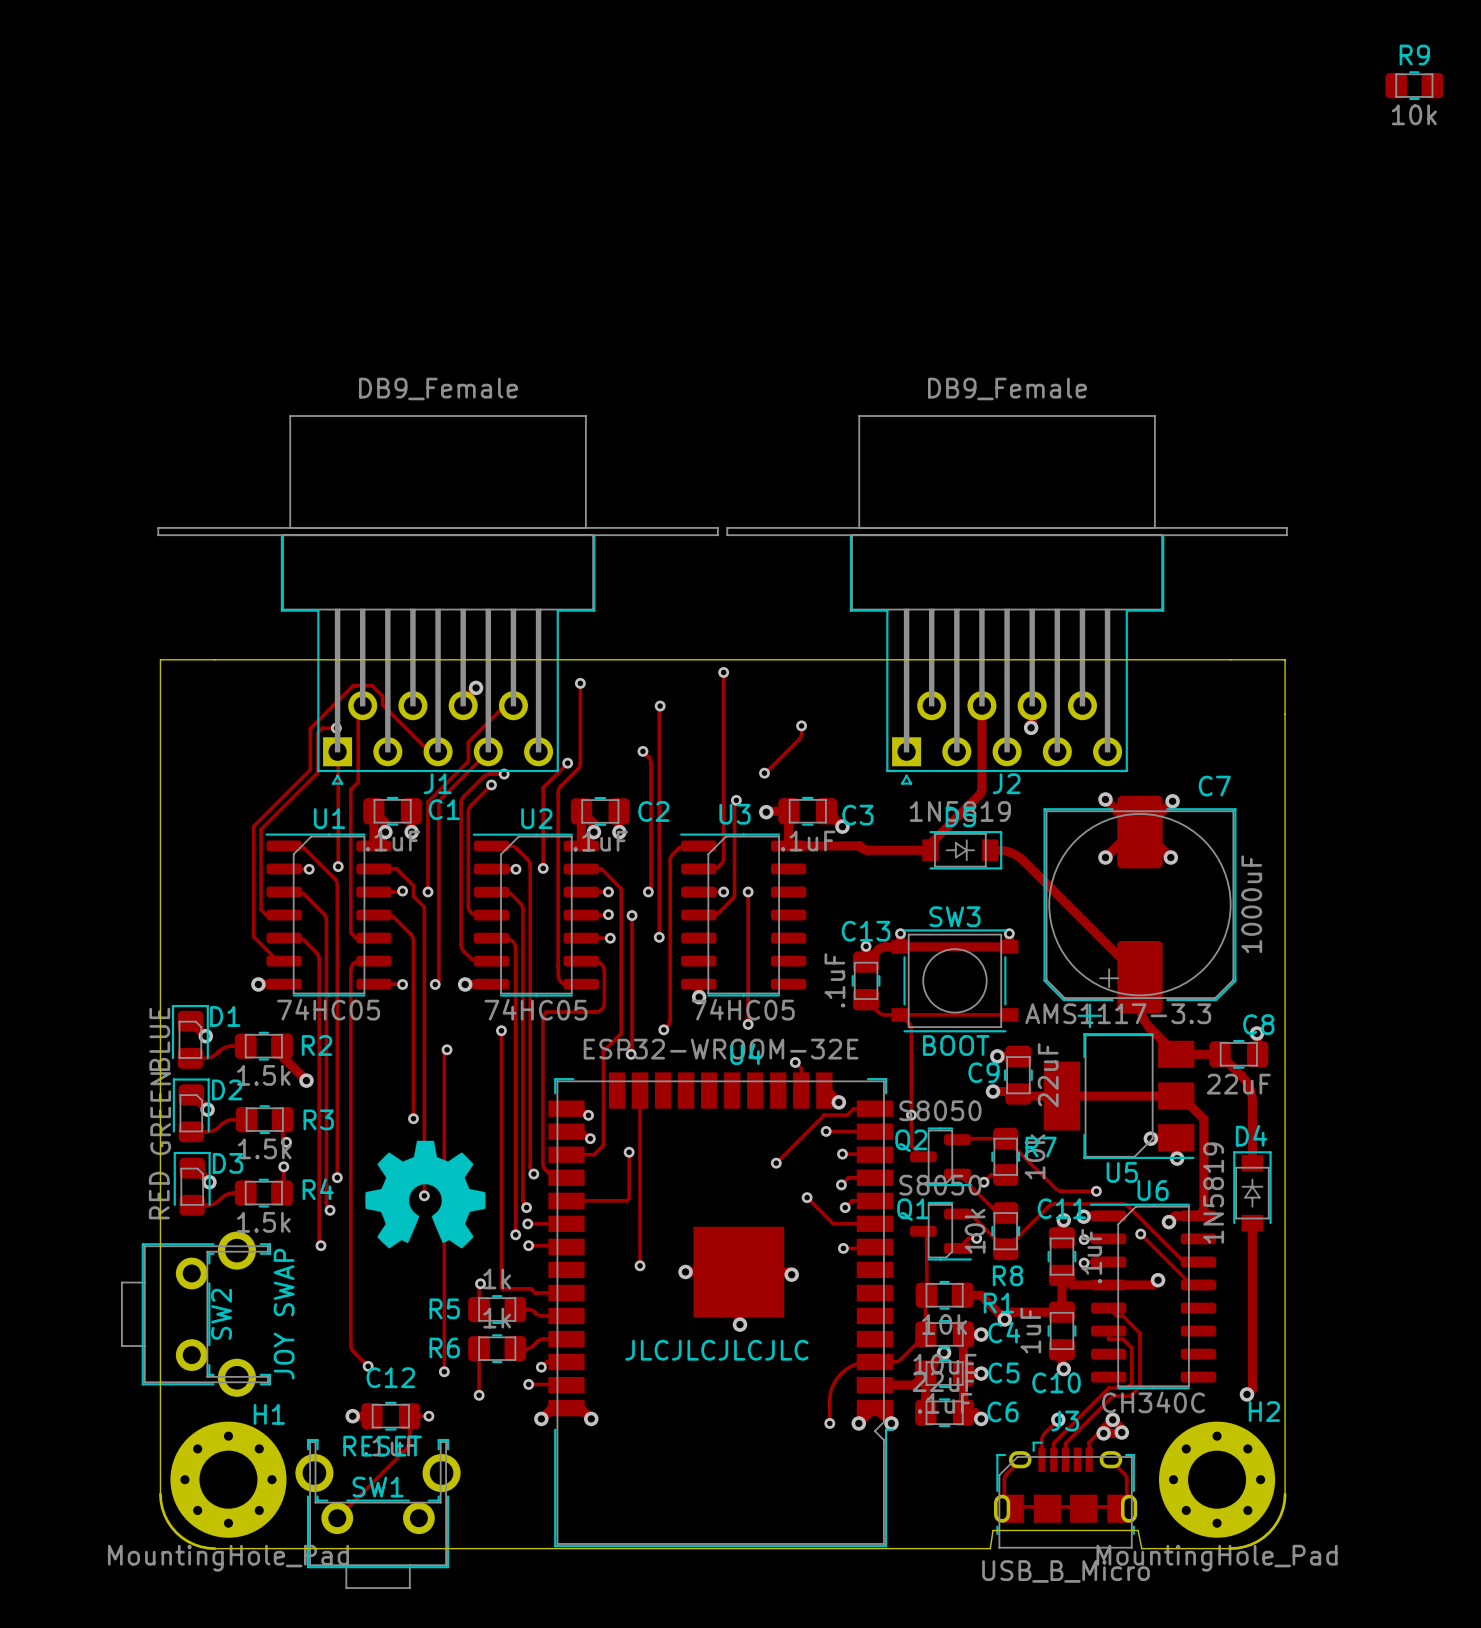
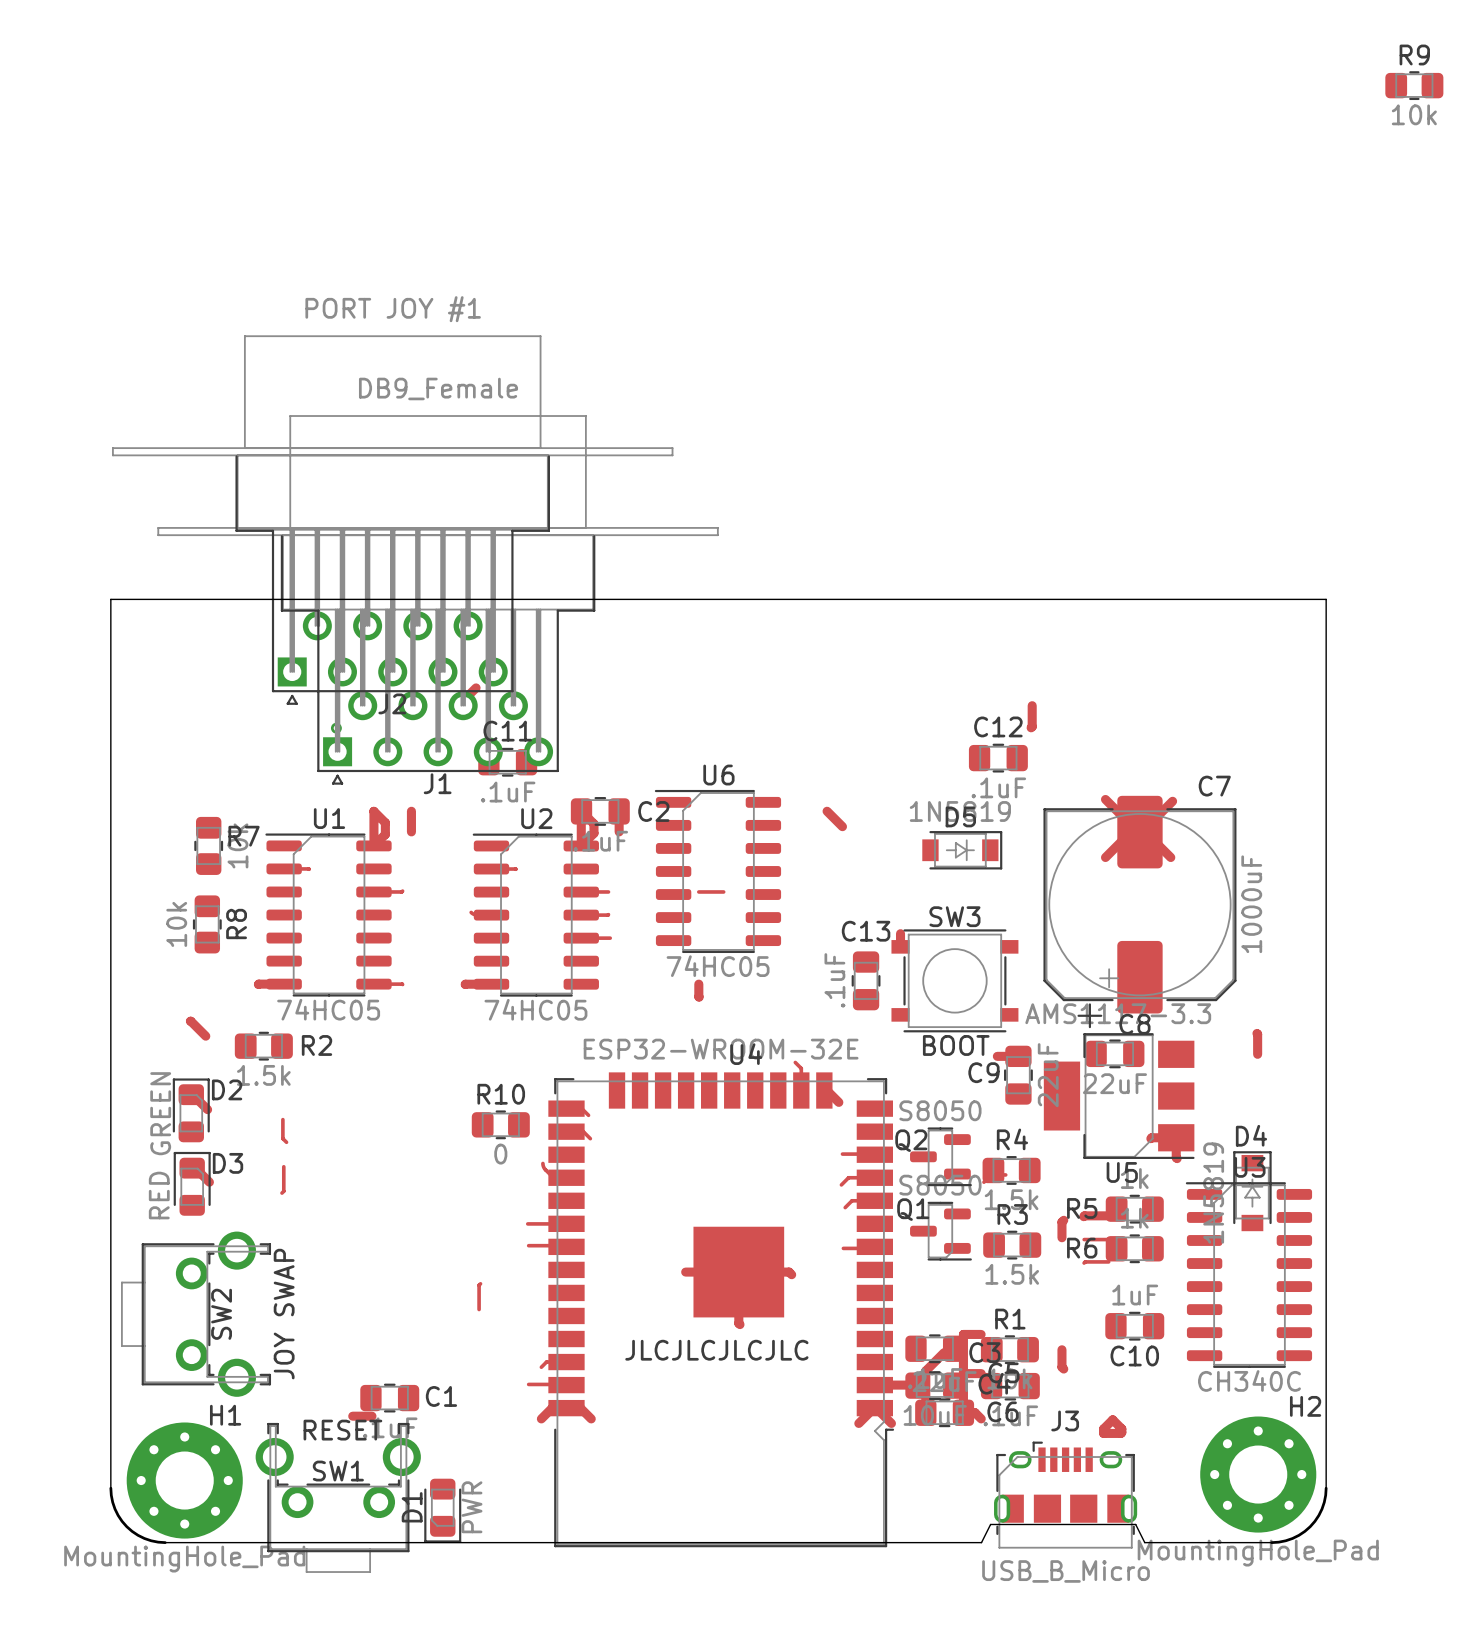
J2 value: DB9_Female (1007, 388) -> PORT JOY #1 (393, 309)
J2 position: (1007, 599) -> (392, 520)
board edge: (160, 659) (160, 1494) (162, 1508) (167, 1521) (181, 1537) (200, 1546) (214, 1548) (990, 1548) (993, 1530) (1138, 1530) (1141, 1548) (1230, 1548) (1244, 1546) (1257, 1541) (1273, 1527) (1280, 1515) (1285, 1494) (1285, 659) (160, 659) -> (110, 599) (110, 1488) (112, 1502) (118, 1515) (132, 1531) (151, 1540) (165, 1542) (981, 1542) (990, 1524) (1135, 1524) (1144, 1542) (1271, 1542) (1285, 1540) (1298, 1535) (1314, 1521) (1324, 1502) (1326, 1488) (1326, 599) (110, 599)
track: (723, 672) (723, 859) (716, 868) (698, 868) -> none
via: (723, 672) -> none
track: (580, 683) (580, 764) (558, 791) (558, 967) -> none
via: (580, 683) -> none
via: (476, 687) -> none
track: (362, 705) (358, 710) (358, 782) (350, 789) (350, 932) (356, 938) (373, 938) -> none
track: (513, 705) (504, 705) (468, 742) (468, 761) (428, 801) (428, 891) -> none
track: (981, 705) (981, 792) (932, 841) (930, 850) (867, 850) (859, 845) (788, 845) (788, 811) (766, 812) -> none
track: (660, 706) (659, 937) -> none
via: (660, 706) -> none
via: (801, 725) -> none
track: (801, 726) (799, 738) (764, 773) -> none
via: (1031, 727) -> none
track: (336, 728) (322, 728) (317, 732) (317, 772) (261, 829) (261, 909) (266, 915) (284, 915) -> none
track: (337, 751) (338, 866) -> none
track: (438, 751) (429, 751) (382, 704) (382, 696) (372, 685) (353, 685) (310, 728) (310, 769) (253, 826) (253, 936) (277, 960) (284, 961) -> none
track: (488, 751) (438, 801) (438, 980) (435, 984) -> none
track: (642, 751) (649, 757) (651, 763) (651, 885) (648, 891) -> none
via: (642, 751) -> none
track: (567, 763) (543, 787) (543, 868) -> none
via: (567, 763) -> none
via: (764, 773) -> none
track: (504, 774) (485, 775) (463, 796) (461, 802) (461, 945) (473, 960) (491, 961) -> none
via: (504, 774) -> none
track: (491, 784) (468, 810) (468, 905) (471, 912) -> none
via: (491, 784) -> none
via: (1105, 799) -> none
track: (736, 800) (734, 802) (734, 895) (717, 913) (698, 915) -> none
via: (736, 800) -> none
via: (1172, 801) -> none
C1 position: (392, 811) -> (389, 1398)
C3 position: (807, 811) -> (934, 1348)
via: (766, 812) -> none
via: (842, 826) -> none
via: (385, 832) -> none
via: (411, 832) -> none
via: (593, 832) -> none
via: (619, 832) -> none
U3 footprint: [680, 833, 807, 997] -> [1185, 1182, 1313, 1368]
track: (284, 845) (303, 847) (334, 878) (337, 883) (337, 1177) -> none
track: (491, 845) (514, 847) (527, 859) (530, 864) (530, 1166) (533, 1174) -> none
track: (698, 845) (680, 846) (670, 859) (670, 1019) (663, 1029) -> none
track: (990, 850) (1008, 851) (1020, 858) (1139, 977) (1140, 1006) (1142, 1016) (1148, 1026) (1176, 1054) (1220, 1054) (1244, 1078) (1249, 1087) (1252, 1098) (1252, 1163) -> none
via: (1105, 857) -> none
via: (1170, 857) -> none
via: (338, 866) -> none
track: (373, 868) (396, 868) (413, 885) (413, 896) (424, 907) (424, 1195) -> none
via: (543, 868) -> none
via: (309, 869) -> none
via: (515, 869) -> none
track: (581, 869) (601, 869) (621, 888) (621, 1033) (603, 1051) (603, 1145) (593, 1154) (566, 1154) -> none
track: (284, 891) (303, 893) (323, 913) (326, 919) (326, 1202) (330, 1210) -> none
via: (402, 891) -> none
via: (428, 891) -> none
via: (608, 891) -> none
via: (648, 891) -> none
via: (723, 891) -> none
track: (748, 891) (748, 1024) -> none
via: (748, 891) -> none
track: (491, 892) (509, 893) (522, 908) (522, 1200) (526, 1207) -> none
via: (608, 914) -> none
track: (373, 915) (392, 916) (410, 934) (413, 939) (413, 1118) -> none
track: (632, 915) (631, 1054) -> none
via: (632, 915) -> none
via: (900, 933) -> none
track: (1009, 933) (1009, 946) (884, 946) (879, 948) (866, 962) (866, 946) -> none
via: (1009, 933) -> none
via: (659, 937) -> none
track: (284, 938) (302, 939) (316, 952) (319, 957) (319, 1243) (320, 1245) -> none
track: (491, 938) (508, 938) (515, 947) (515, 1234) -> none
via: (610, 938) -> none
via: (866, 946) -> none
track: (373, 961) (356, 961) (352, 964) (350, 970) (350, 1345) (352, 1350) (368, 1366) -> none
track: (581, 961) (596, 961) (603, 966) (604, 1004) (601, 1009) (596, 1011) (546, 1012) (543, 1015) (542, 1161) -> none
track: (558, 967) (558, 978) (563, 984) (581, 984) -> none
via: (258, 984) -> none
via: (402, 984) -> none
via: (435, 984) -> none
via: (465, 984) -> none
via: (699, 997) -> none
track: (866, 999) (879, 1012) (884, 1014) (1009, 1014) -> none
U3 value: 74HC05 (743, 1009) -> CH340C (1249, 1380)
track: (900, 1014) (911, 1028) (911, 1145) (922, 1156) -> none
via: (748, 1024) -> none
via: (663, 1029) -> none
track: (501, 1030) (501, 1287) (531, 1288) (535, 1292) (566, 1292) -> none
via: (501, 1030) -> none
via: (1256, 1033) -> none
D1 rotation: 0° (190, 1036) -> 180° (442, 1510)
D1 position: (190, 1036) -> (442, 1510)
via: (205, 1036) -> none
D1 value: BLUE (159, 1039) -> PWR (472, 1507)
track: (245, 1046) (226, 1046) (208, 1058) (190, 1058) -> none
track: (281, 1046) (281, 1056) (306, 1080) -> none
track: (447, 1049) (444, 1052) (444, 1371) -> none
via: (447, 1049) -> none
via: (631, 1054) -> none
C8 position: (1238, 1054) -> (1114, 1053)
via: (997, 1056) -> none
via: (795, 1062) -> none
via: (306, 1080) -> none
track: (640, 1090) (640, 1265) -> none
track: (993, 1091) (1012, 1091) (1017, 1096) (1180, 1096) (1203, 1119) (1203, 1210) (1198, 1215) (1175, 1215) (1168, 1222) -> none
via: (993, 1091) -> none
via: (838, 1102) -> none
track: (874, 1108) (853, 1108) (847, 1115) (824, 1115) (776, 1163) -> none
via: (207, 1109) -> none
via: (588, 1115) -> none
via: (911, 1115) -> none
via: (413, 1118) -> none
track: (246, 1119) (228, 1120) (210, 1131) (191, 1131) -> none
R3 position: (264, 1119) -> (1012, 1245)
R3 name position: R3 (318, 1119) -> R3 (1012, 1214)
R10: none -> 0 (500, 1124)
track: (826, 1131) (874, 1131) -> none
via: (826, 1131) -> none
via: (590, 1138) -> none
via: (1150, 1138) -> none
track: (958, 1139) (1005, 1138) (1057, 1190) (1096, 1191) -> none
drawing: [365, 1140, 486, 1249] -> none
via: (286, 1142) -> none
track: (629, 1152) (629, 1198) (626, 1200) (566, 1200) -> none
via: (629, 1152) -> none
via: (842, 1154) -> none
R7 position: (1005, 1156) -> (208, 845)
via: (1177, 1158) -> none
via: (776, 1163) -> none
via: (283, 1166) -> none
via: (533, 1174) -> none
track: (958, 1174) (997, 1213) (1005, 1213) -> none
via: (337, 1177) -> none
via: (209, 1182) -> none
via: (983, 1182) -> none
via: (841, 1184) -> none
R4 name position: R4 (318, 1189) -> R4 (1012, 1139)
via: (1096, 1191) -> none
track: (245, 1193) (228, 1193) (210, 1204) (192, 1205) -> none
R4 position: (263, 1193) -> (1011, 1170)
via: (424, 1195) -> none
track: (807, 1197) (833, 1223) (874, 1223) -> none
via: (807, 1197) -> none
U6 footprint: [1089, 1203, 1217, 1390] -> [654, 789, 782, 954]
via: (526, 1207) -> none
via: (845, 1207) -> none
via: (330, 1210) -> none
track: (958, 1213) (970, 1213) (1005, 1249) (1051, 1204) (1124, 1204) (1182, 1260) (1198, 1261) -> none
via: (1083, 1216) -> none
via: (1063, 1220) -> none
via: (1168, 1222) -> none
via: (527, 1223) -> none
track: (1252, 1223) (1252, 1388) (1246, 1394) -> none
track: (922, 1231) (926, 1235) (925, 1334) (897, 1361) (858, 1363) (842, 1372) (834, 1383) (830, 1393) (829, 1423) -> none
R8 position: (1005, 1231) -> (207, 924)
via: (515, 1234) -> none
track: (1140, 1234) (1191, 1284) (1198, 1284) -> none
via: (1140, 1234) -> none
track: (976, 1238) (968, 1238) (958, 1248) -> none
via: (976, 1238) -> none
via: (1084, 1239) -> none
via: (320, 1245) -> none
via: (528, 1245) -> none
via: (843, 1248) -> none
C11 rotation: 0° (1061, 1256) -> 90° clockwise (507, 762)
C11 position: (1061, 1256) -> (507, 762)
via: (1084, 1263) -> none
via: (640, 1265) -> none
via: (685, 1271) -> none
via: (791, 1274) -> none
R8 name rotation: 0° (1007, 1275) -> 90° counterclockwise (236, 923)
R8 name position: R8 (1007, 1275) -> R8 (236, 923)
track: (1158, 1280) (1153, 1284) (1071, 1284) (1061, 1275) (1061, 1312) (1011, 1312) (1004, 1319) -> none
via: (1158, 1280) -> none
via: (480, 1283) -> none
R1 position: (944, 1295) -> (1009, 1349)
track: (962, 1295) (980, 1295) (1004, 1319) -> none
R1 name position: R1 (998, 1303) -> R1 (1010, 1319)
track: (1108, 1307) (1116, 1316) (1123, 1316) (1139, 1333) (1139, 1386) (1130, 1396) (1112, 1396) (1065, 1443) (1065, 1459) -> none
R5 position: (497, 1309) -> (1134, 1209)
track: (515, 1309) (530, 1309) (541, 1315) (566, 1315) -> none
via: (1004, 1319) -> none
via: (739, 1324) -> none
C10 rotation: 0° (1061, 1330) -> 90° clockwise (1134, 1326)
C10 position: (1061, 1330) -> (1134, 1326)
track: (1108, 1331) (1108, 1339) (1123, 1339) (1131, 1347) (1131, 1383) (1127, 1387) (1108, 1387) (1053, 1443) (1053, 1459) -> none
C4 position: (944, 1334) -> (934, 1385)
via: (981, 1334) -> none
track: (566, 1339) (542, 1339) (530, 1347) (515, 1348) -> none
track: (479, 1348) (479, 1395) -> none
R6 position: (497, 1348) -> (1134, 1248)
via: (944, 1352) -> none
via: (368, 1366) -> none
via: (541, 1367) -> none
via: (1063, 1369) -> none
via: (444, 1371) -> none
C5 position: (944, 1373) -> (1010, 1386)
via: (981, 1373) -> none
C12 name position: C12 (390, 1377) -> C12 (998, 726)
via: (528, 1384) -> none
via: (1246, 1394) -> none
via: (479, 1395) -> none
U6 value: CH340C (1153, 1402) -> 74HC05 (718, 966)
via: (352, 1416) -> none
C12 position: (390, 1416) -> (998, 758)
track: (428, 1416) (409, 1416) (409, 1440) (406, 1448) (337, 1518) -> none
via: (428, 1416) -> none
via: (541, 1418) -> none
via: (591, 1418) -> none
via: (981, 1418) -> none
track: (1058, 1419) (1042, 1436) (1042, 1458) -> none
via: (1058, 1419) -> none
via: (1112, 1419) -> none
via: (829, 1423) -> none
via: (858, 1423) -> none
via: (891, 1423) -> none
via: (1121, 1432) -> none
track: (1103, 1433) (1098, 1433) (1089, 1442) (1089, 1458) -> none
via: (1103, 1433) -> none
track: (1020, 1460) (1004, 1478) (1004, 1500) (1007, 1504) (1012, 1506) (1121, 1506) (1126, 1499) (1126, 1478) (1110, 1460) -> none
H1 position: (228, 1479) -> (184, 1480)
H2 position: (1217, 1479) -> (1258, 1474)
SW1 position: (377, 1513) -> (338, 1497)

